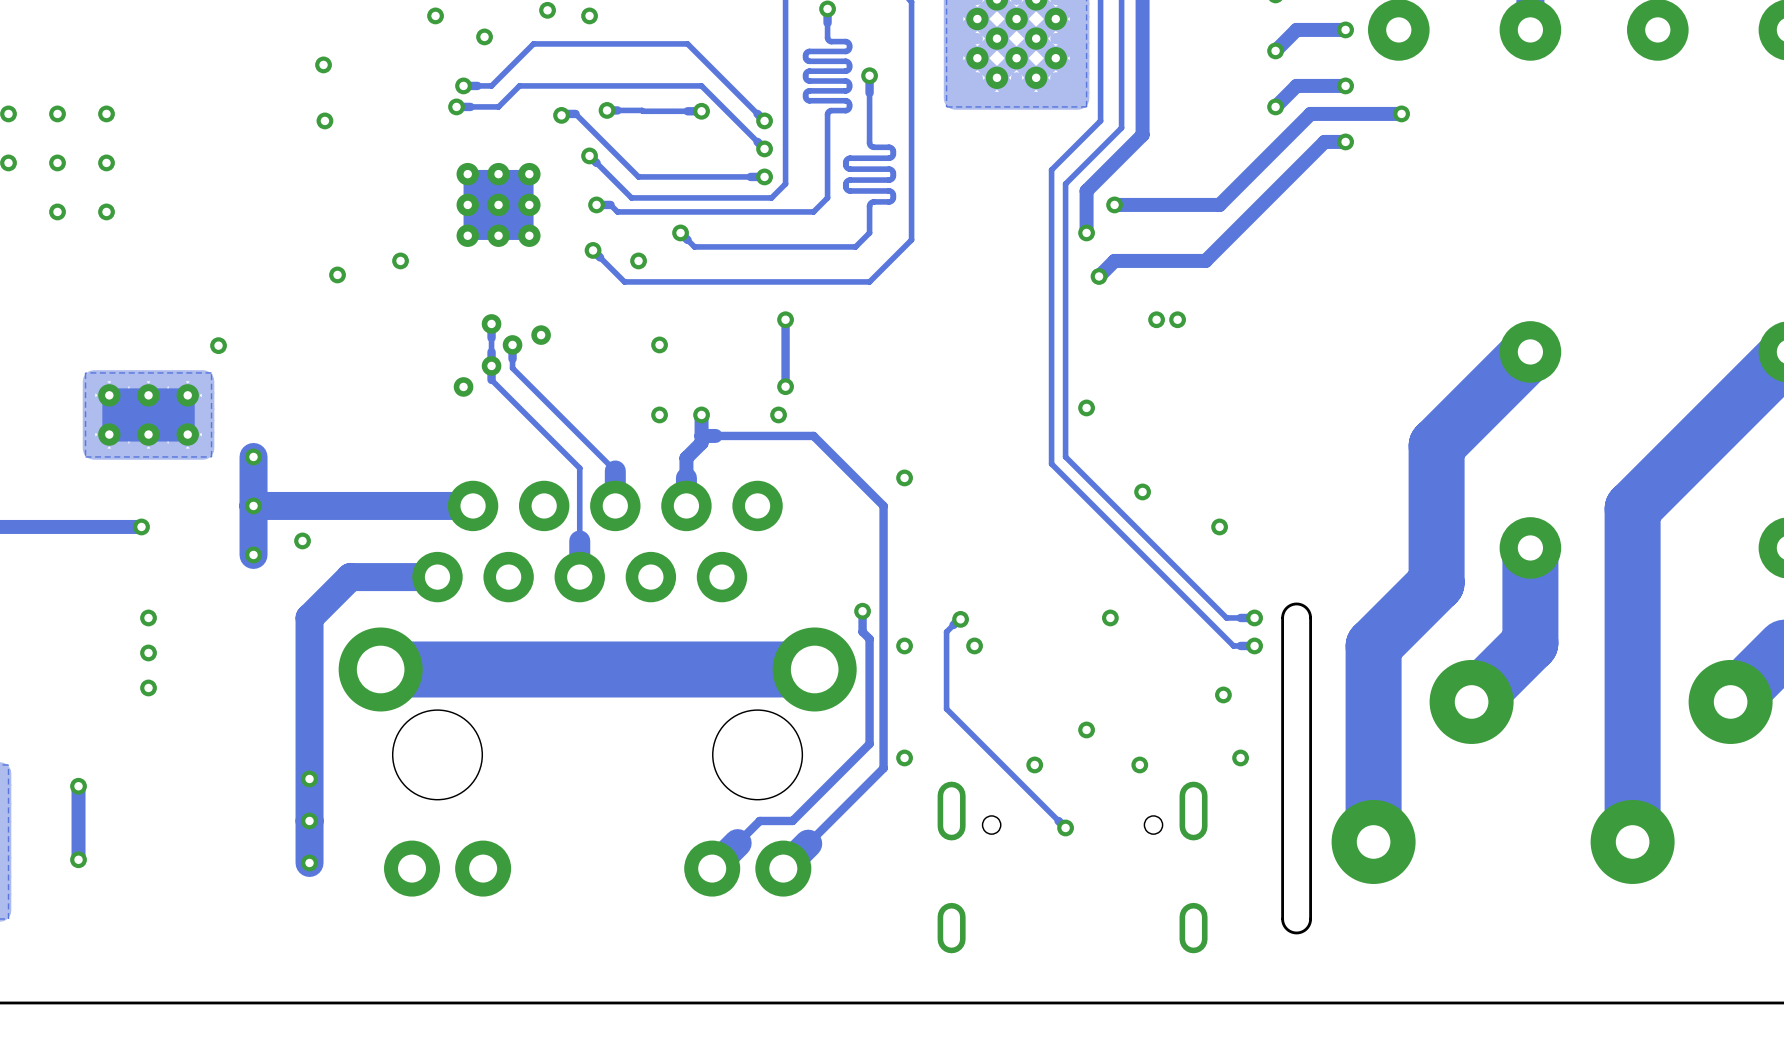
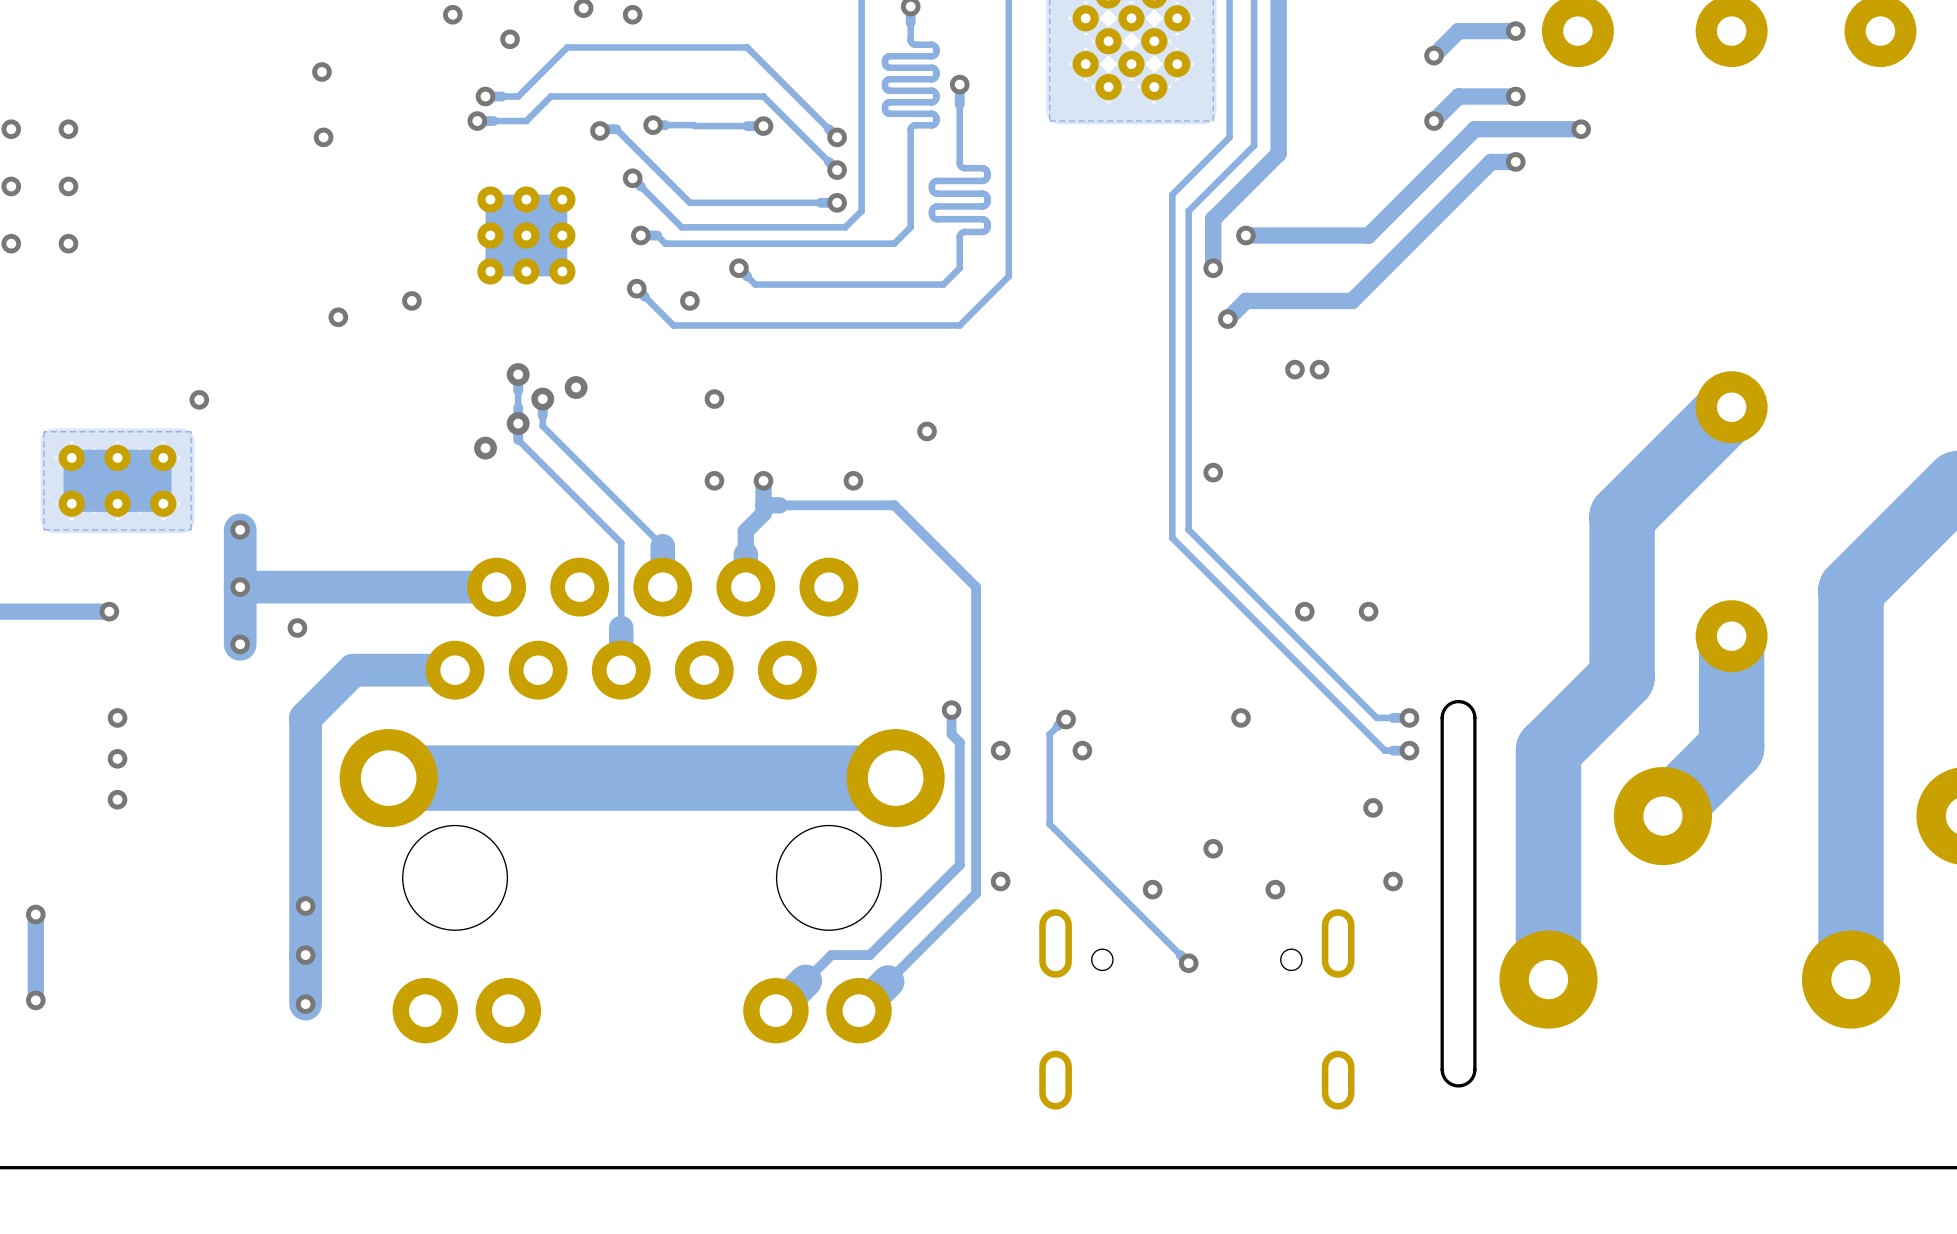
via: (785, 319) -> none
track: (785, 323) (785, 386) -> none
via: none -> (927, 431)
via: (785, 386) -> none
via: (904, 477) -> none
via position: (1142, 491) -> (1304, 611)

